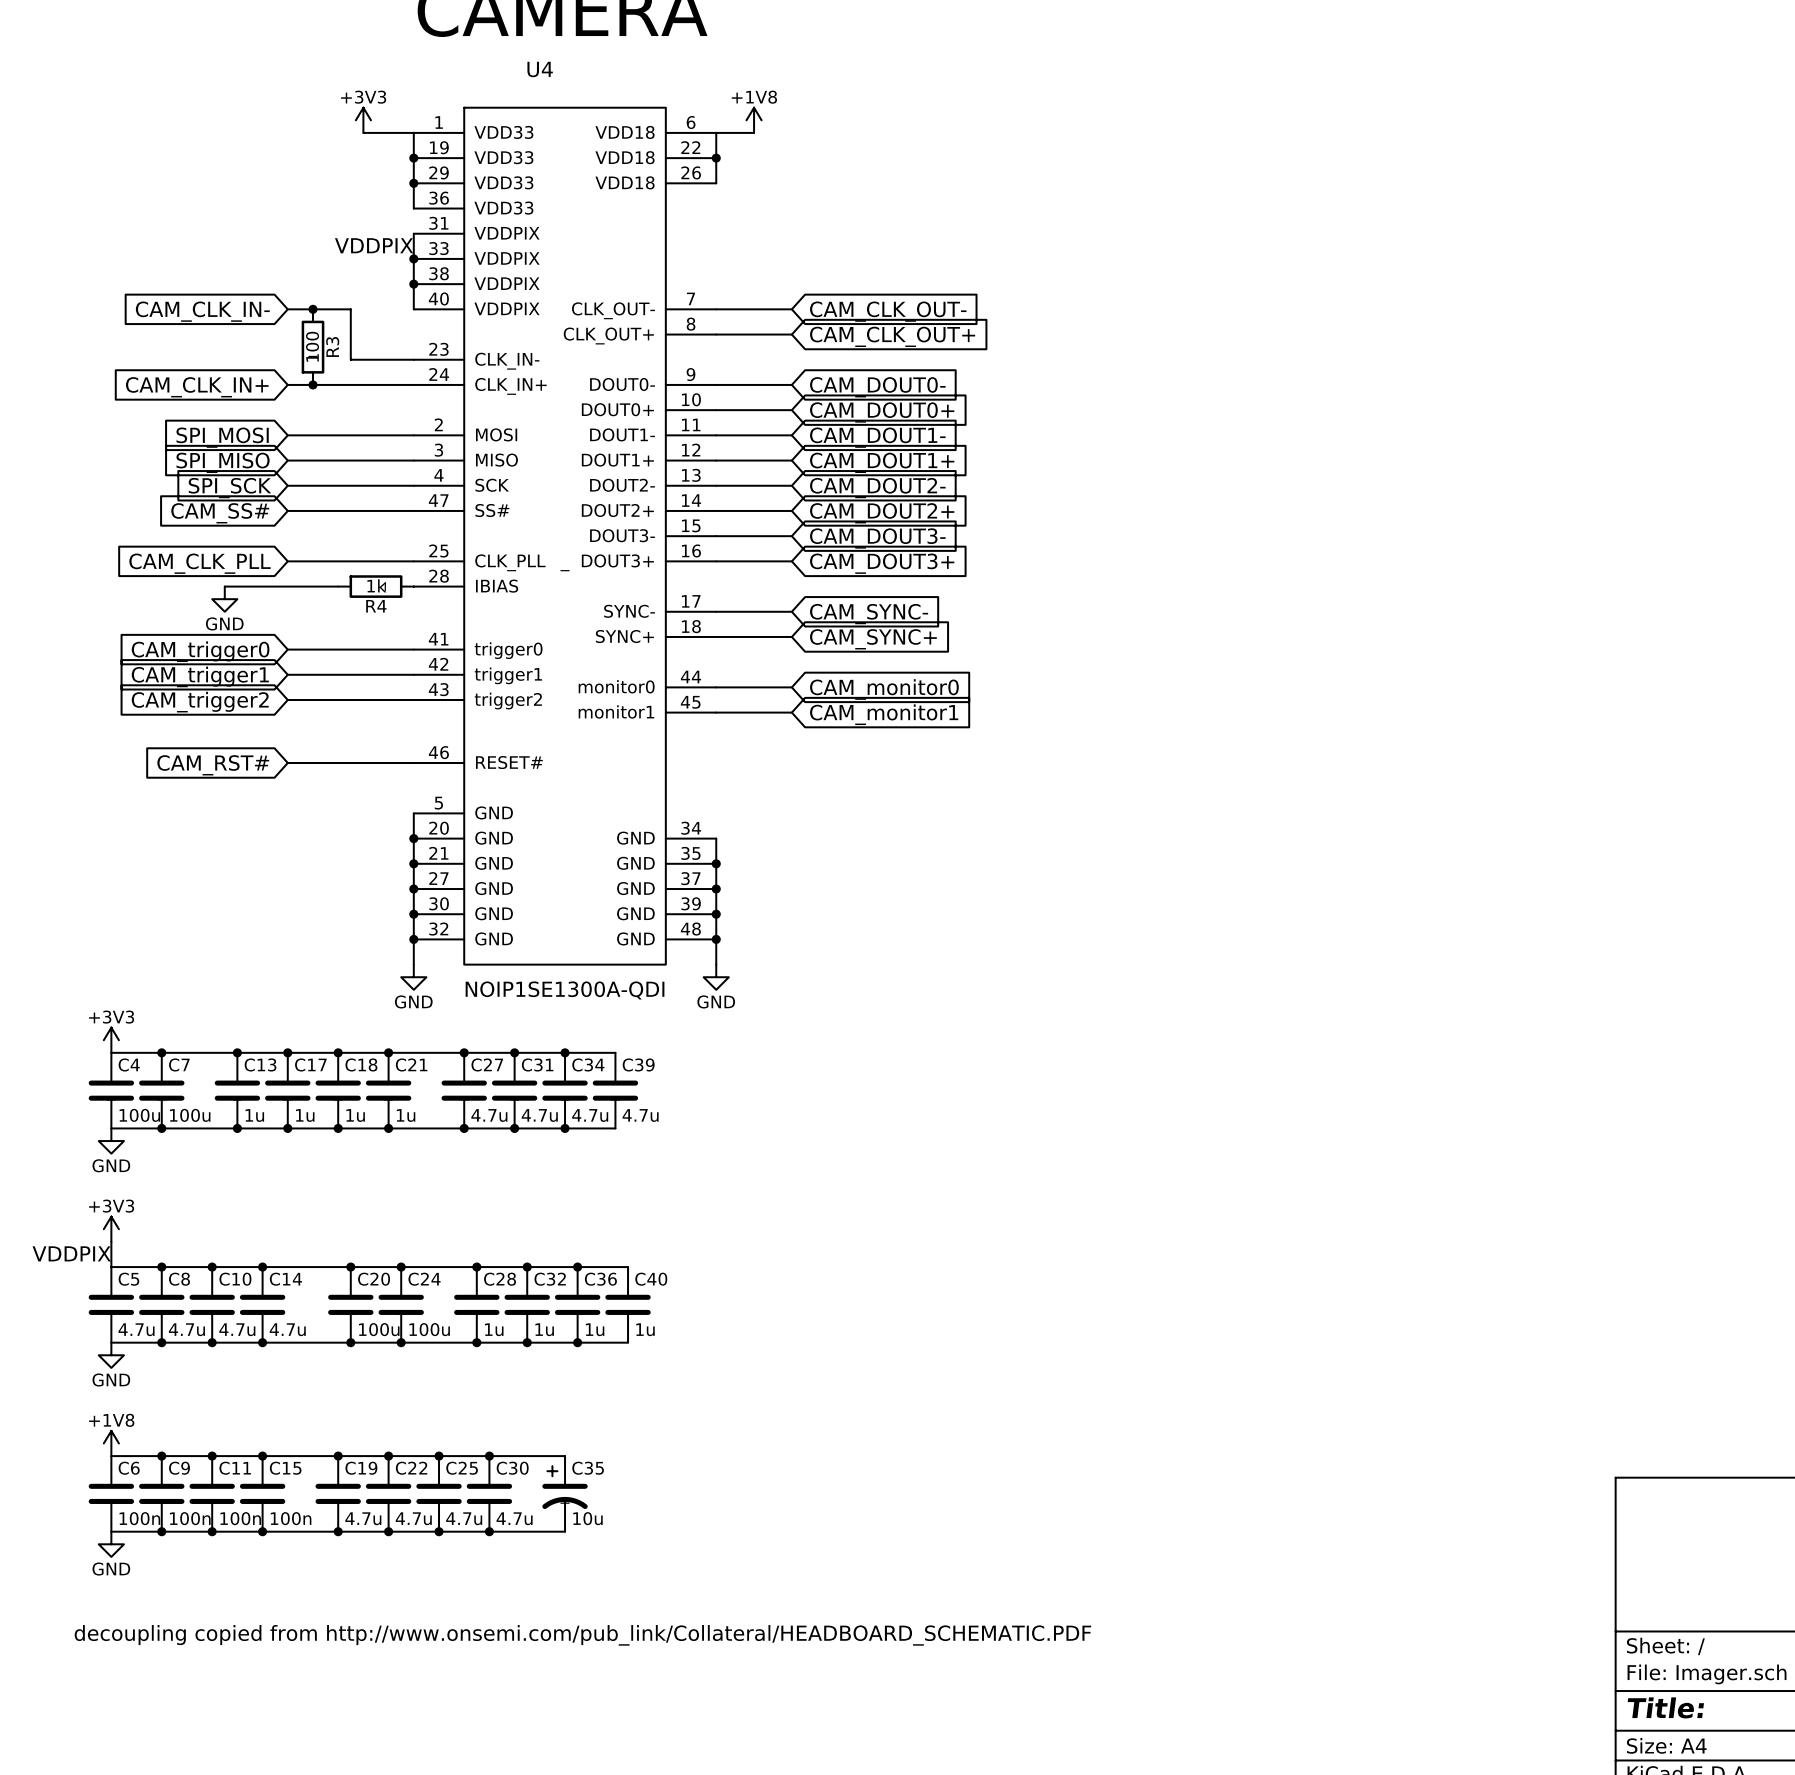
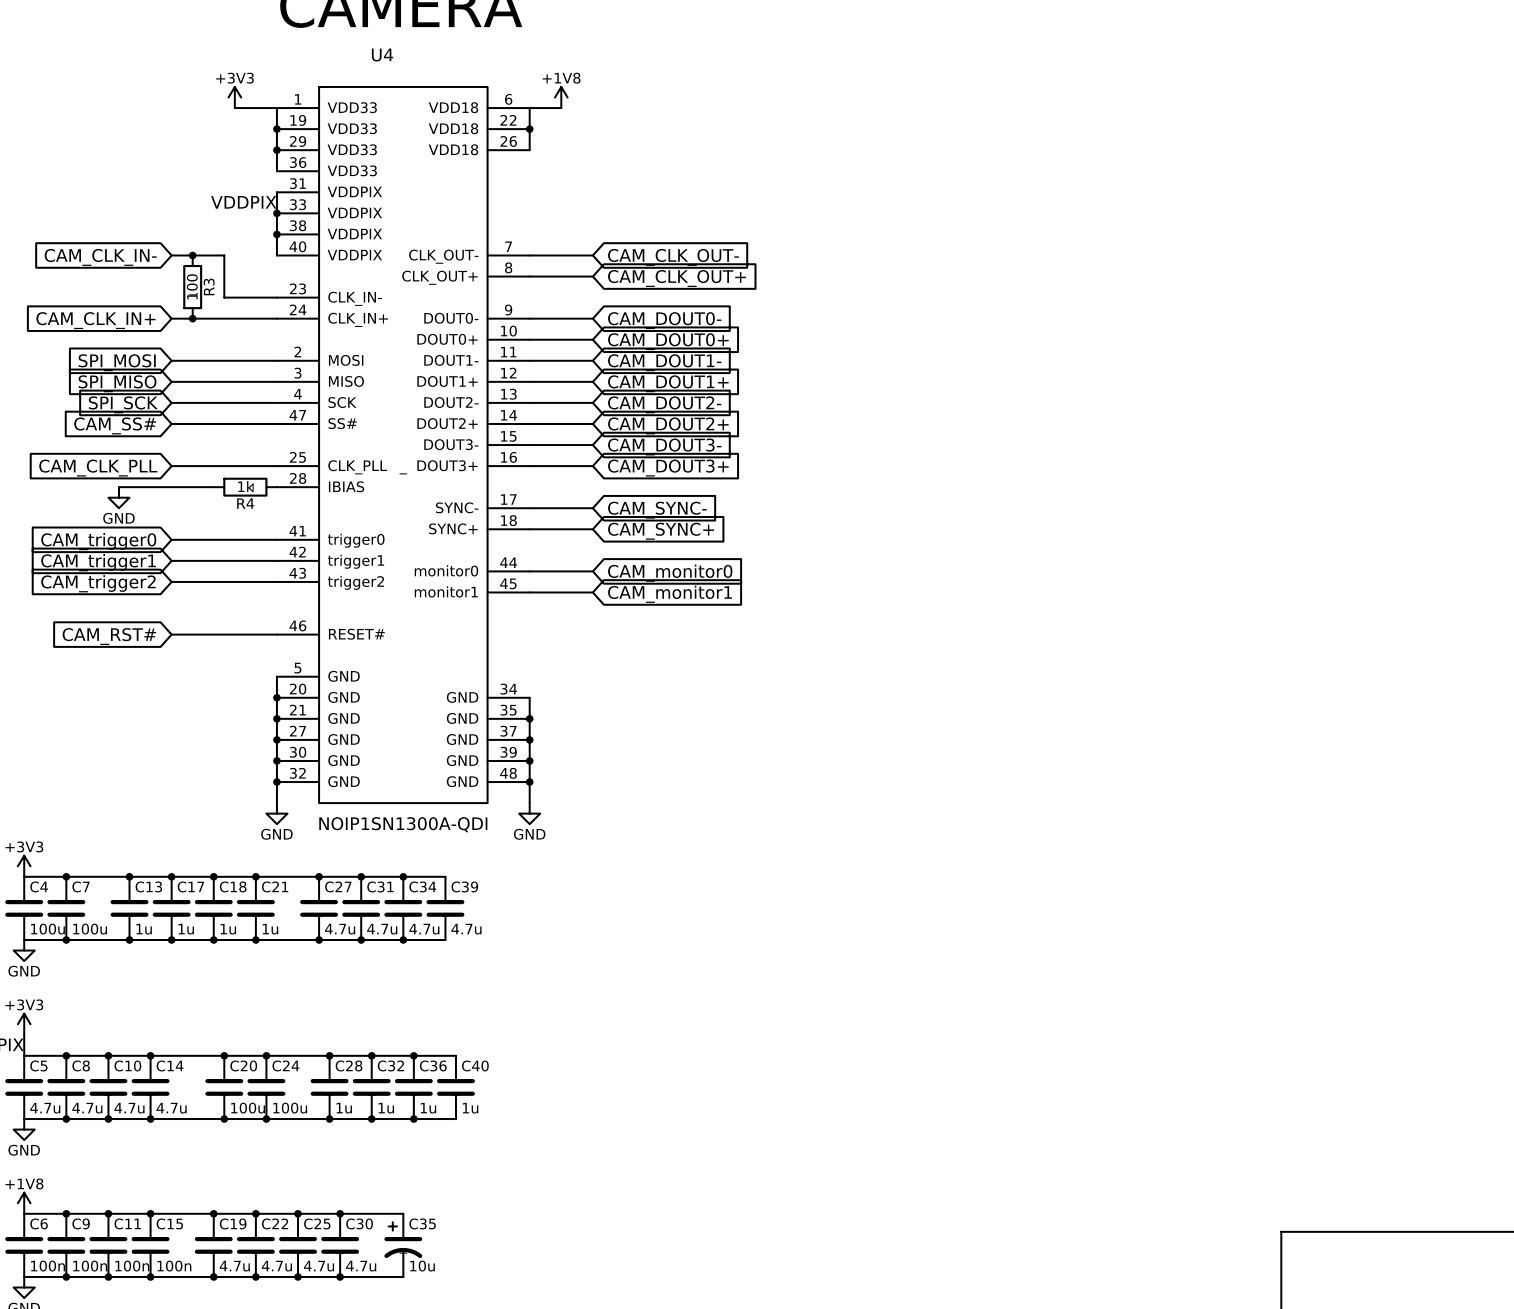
U4 value: NOIP1SE1300A-QDI (565, 990) -> NOIP1SN1300A-QDI (403, 824)

